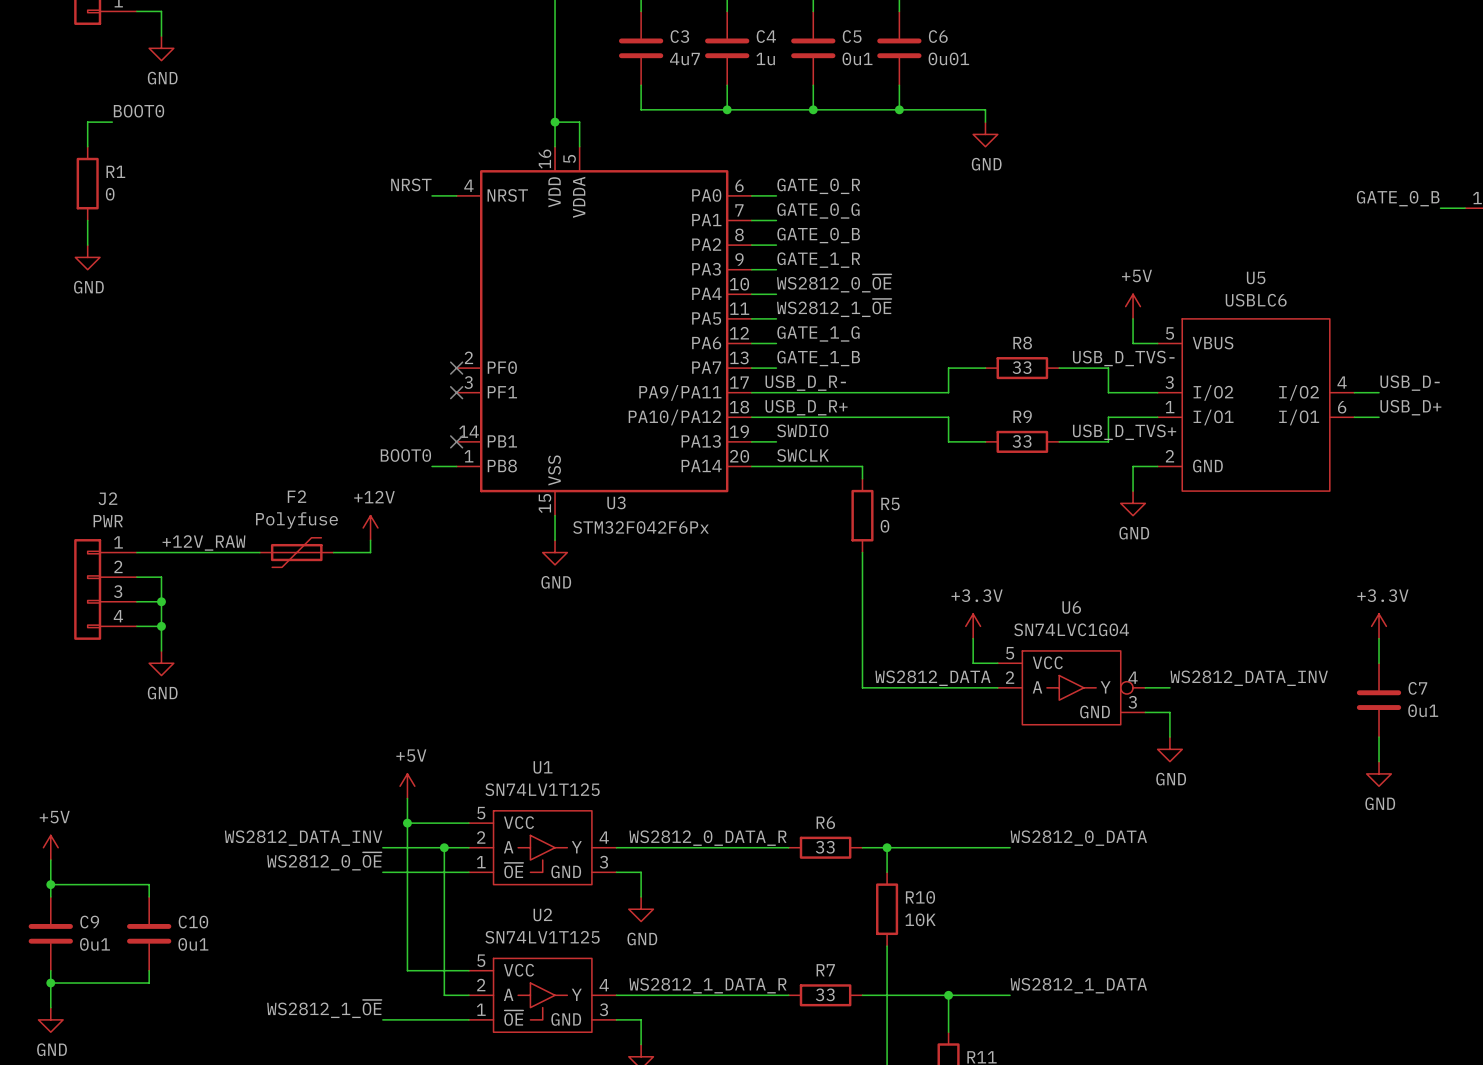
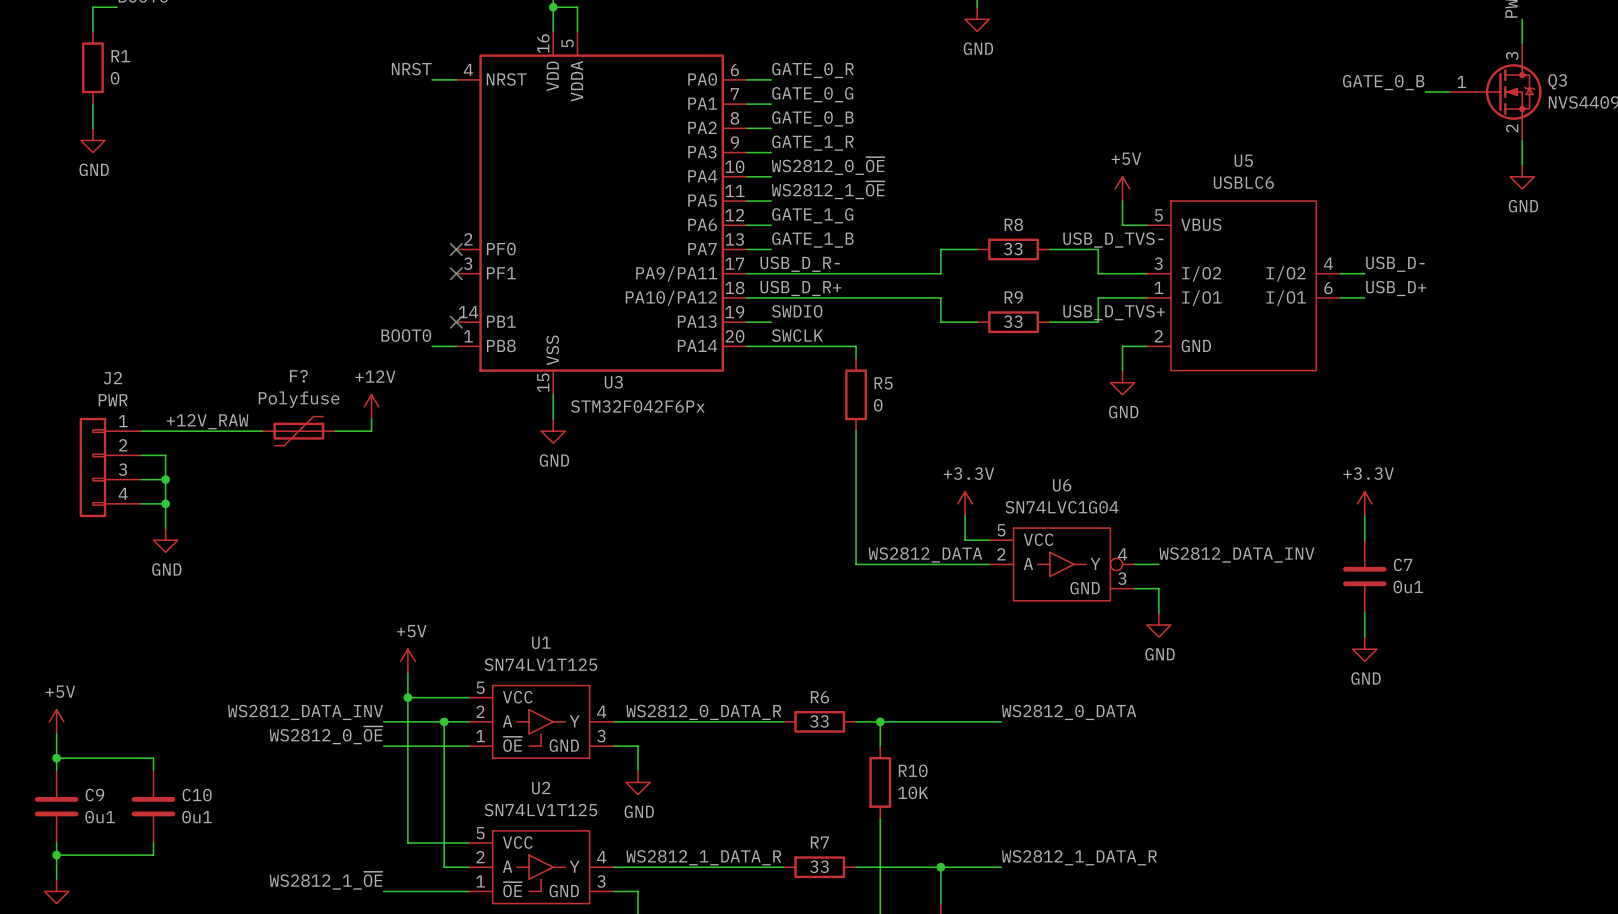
F2 name: F2 (296, 496) -> F? (298, 376)
label: WS2812_1_DATA (1078, 985) -> WS2812_1_DATA_R (1079, 857)

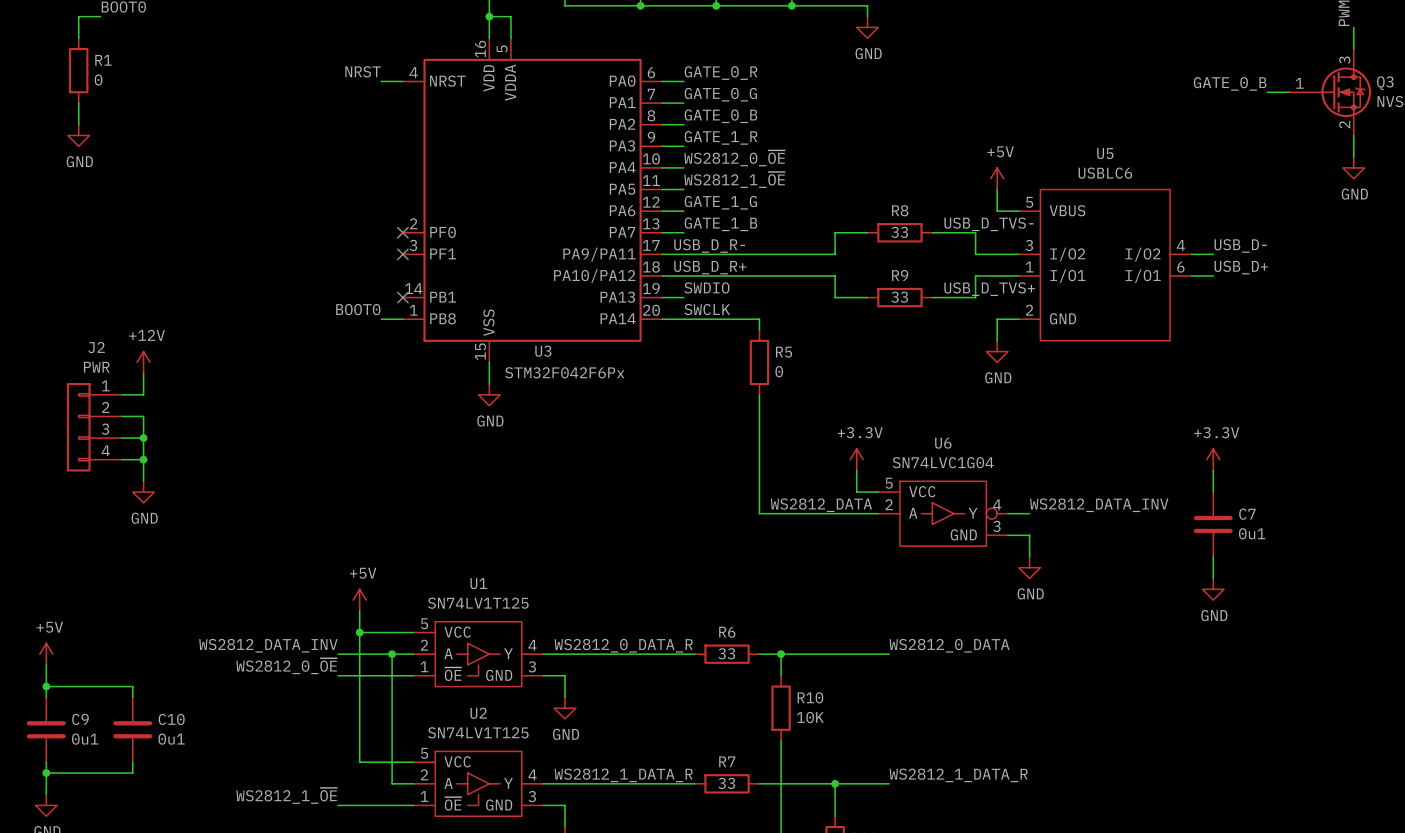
power symbol position: +12V (371, 406) -> +12V (143, 362)
wire: (371, 419) (371, 431) (335, 431) -> none
label: +12V_RAW (207, 421) -> none
wire: (165, 431) (262, 431) -> (143, 394) (143, 373)
F?: Polyfuse (298, 431) -> none

